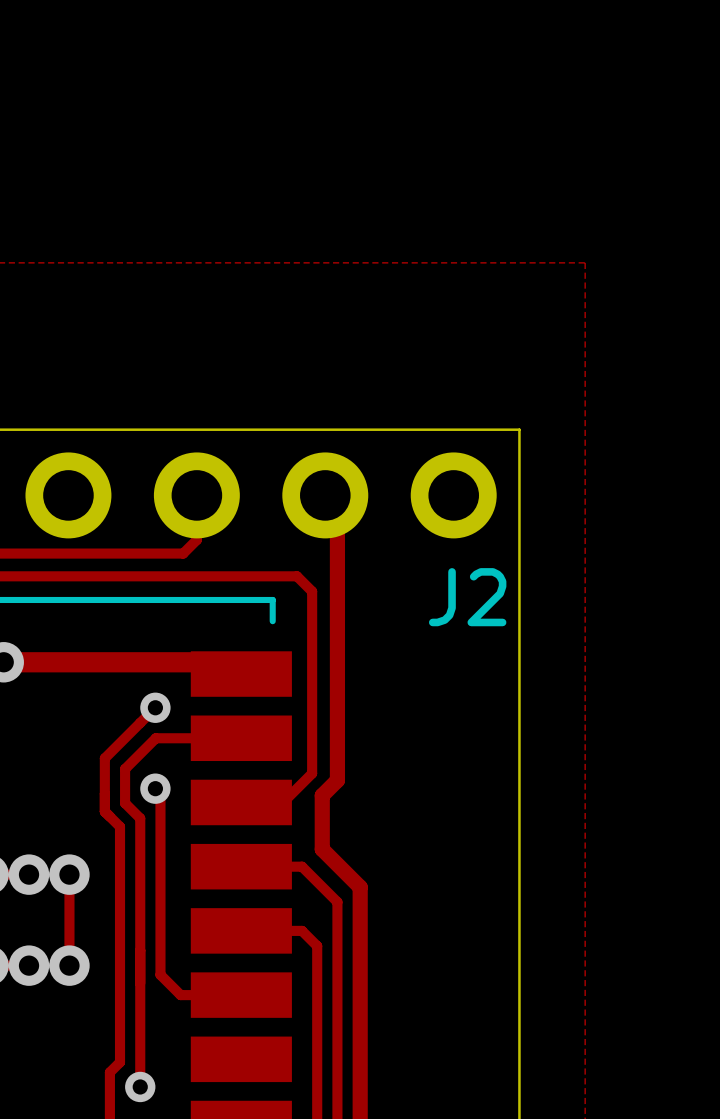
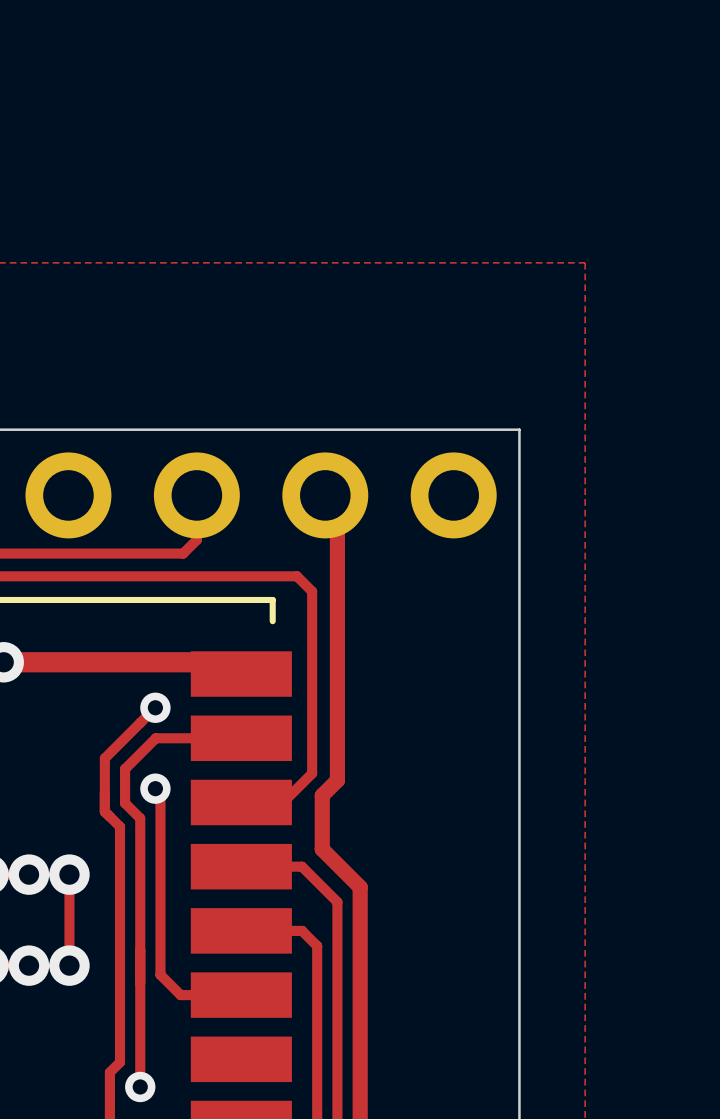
J2 name: J2 (467, 597) -> none

